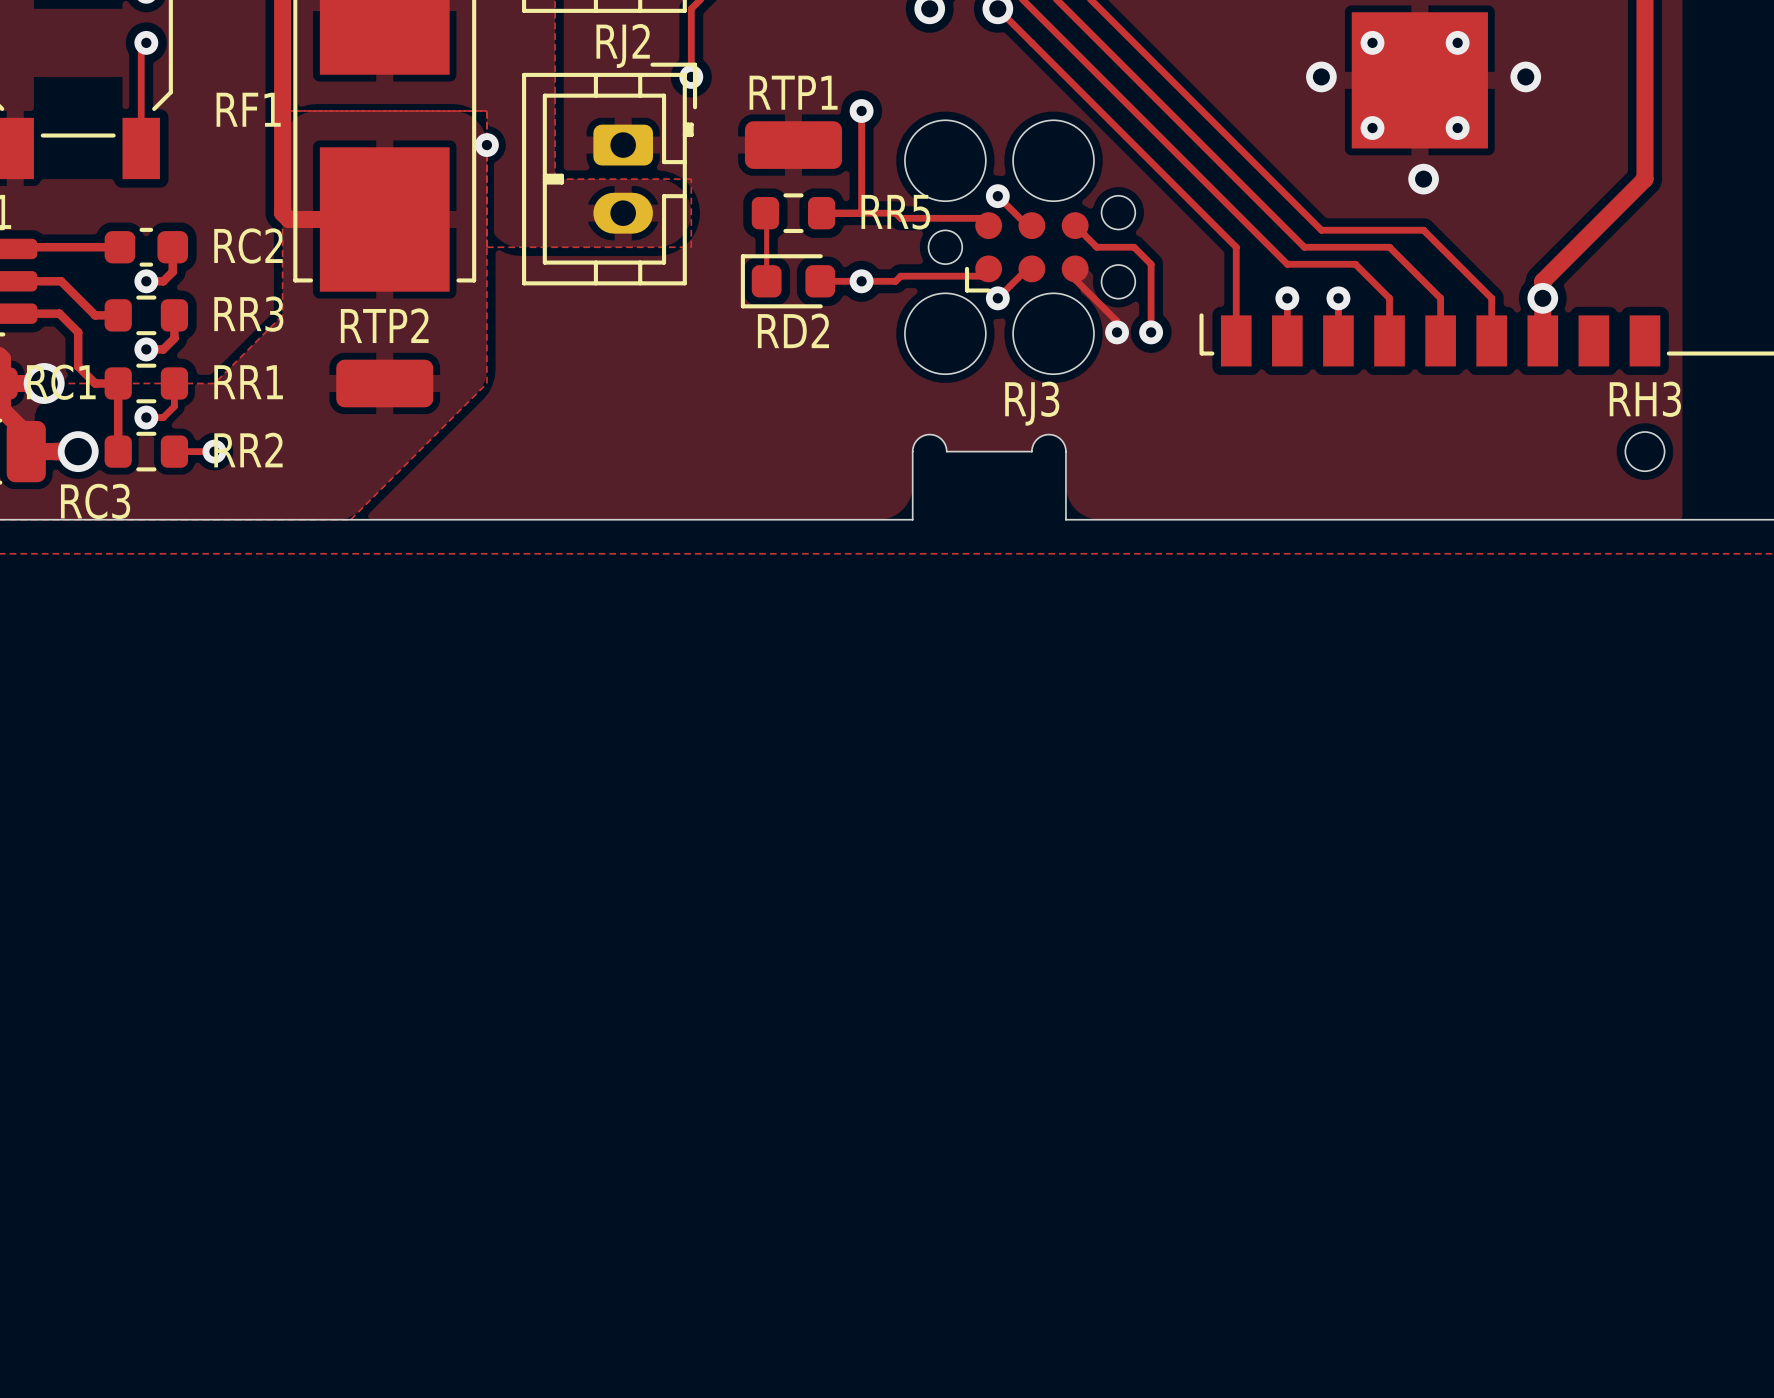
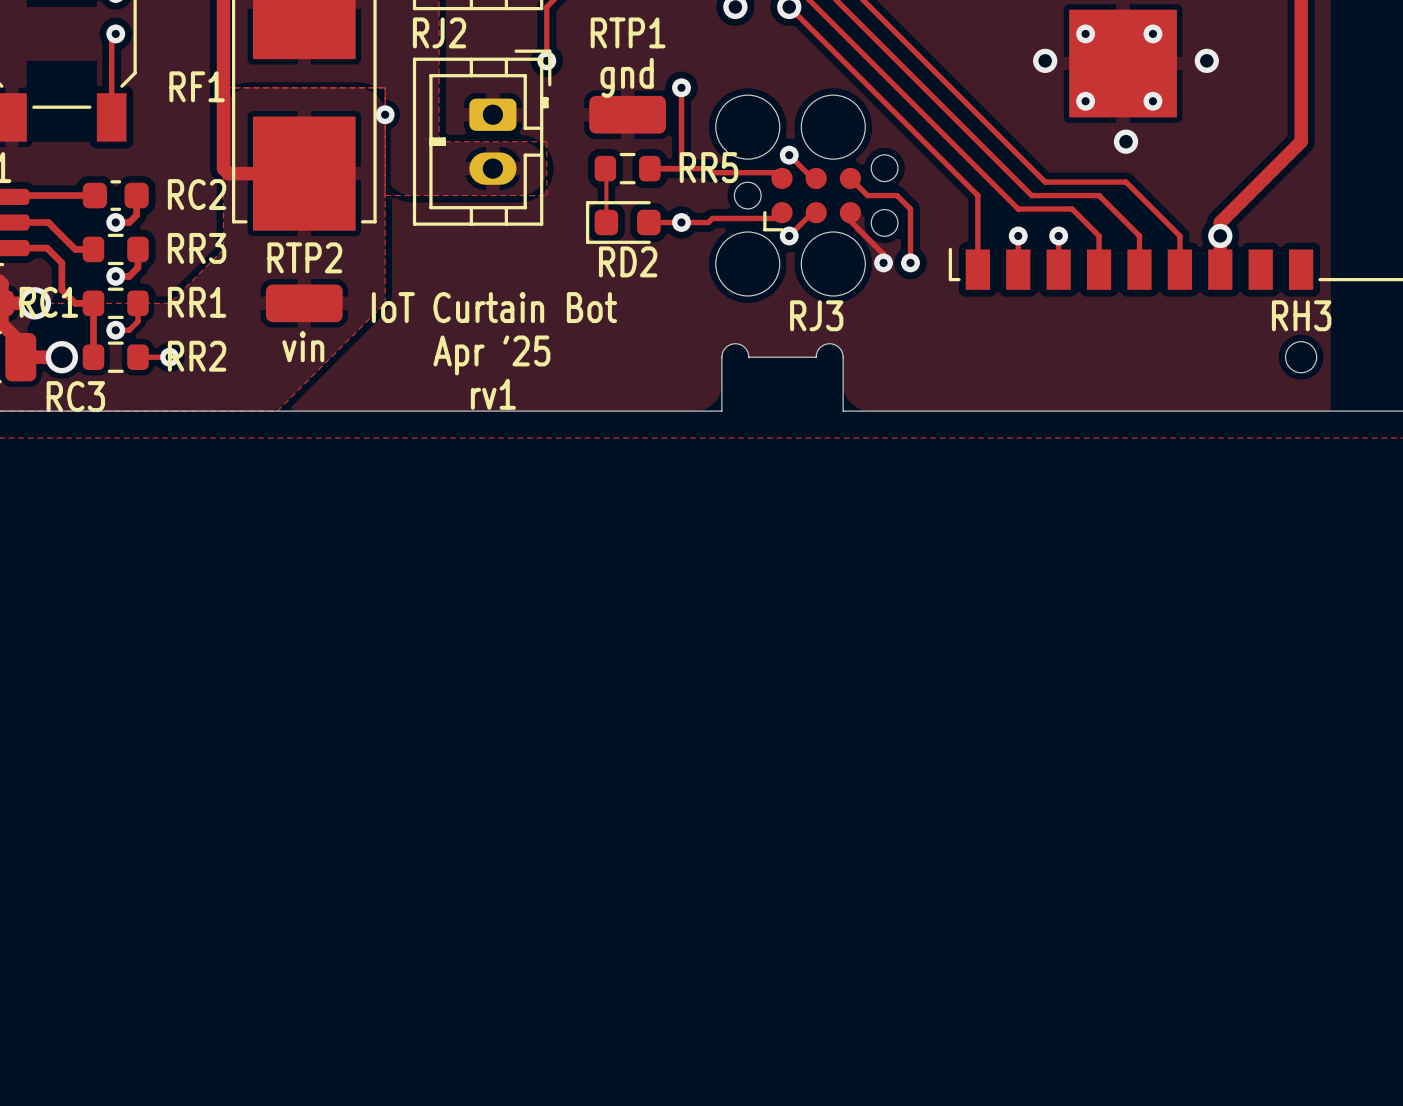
RJ2 name position: RJ2 (623, 45) -> RJ2 (439, 32)
RTP1 name position: RTP1 (793, 92) -> RTP1 (628, 32)
RTP1 value: none -> gnd (627, 77)
text: none -> IoT Curtain Bot (494, 307)
RTP2 value: none -> vin (303, 346)
text: none -> Apr '25 (491, 355)
text: none -> rv1 (493, 394)

